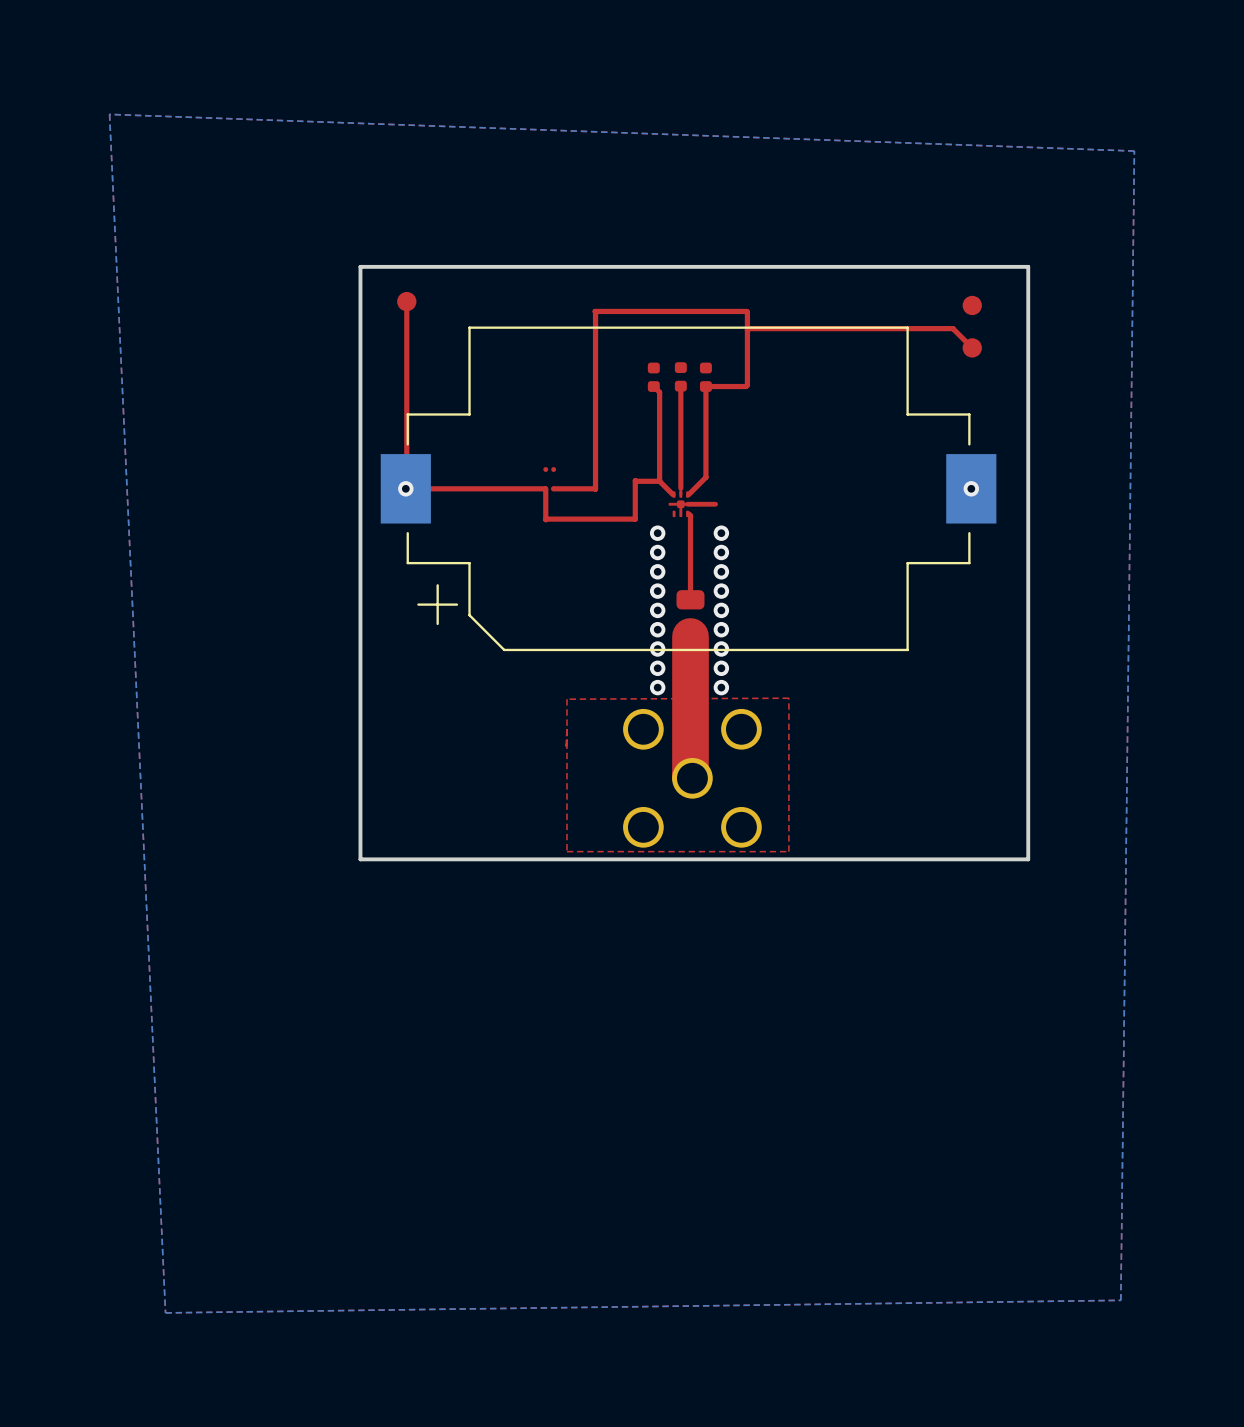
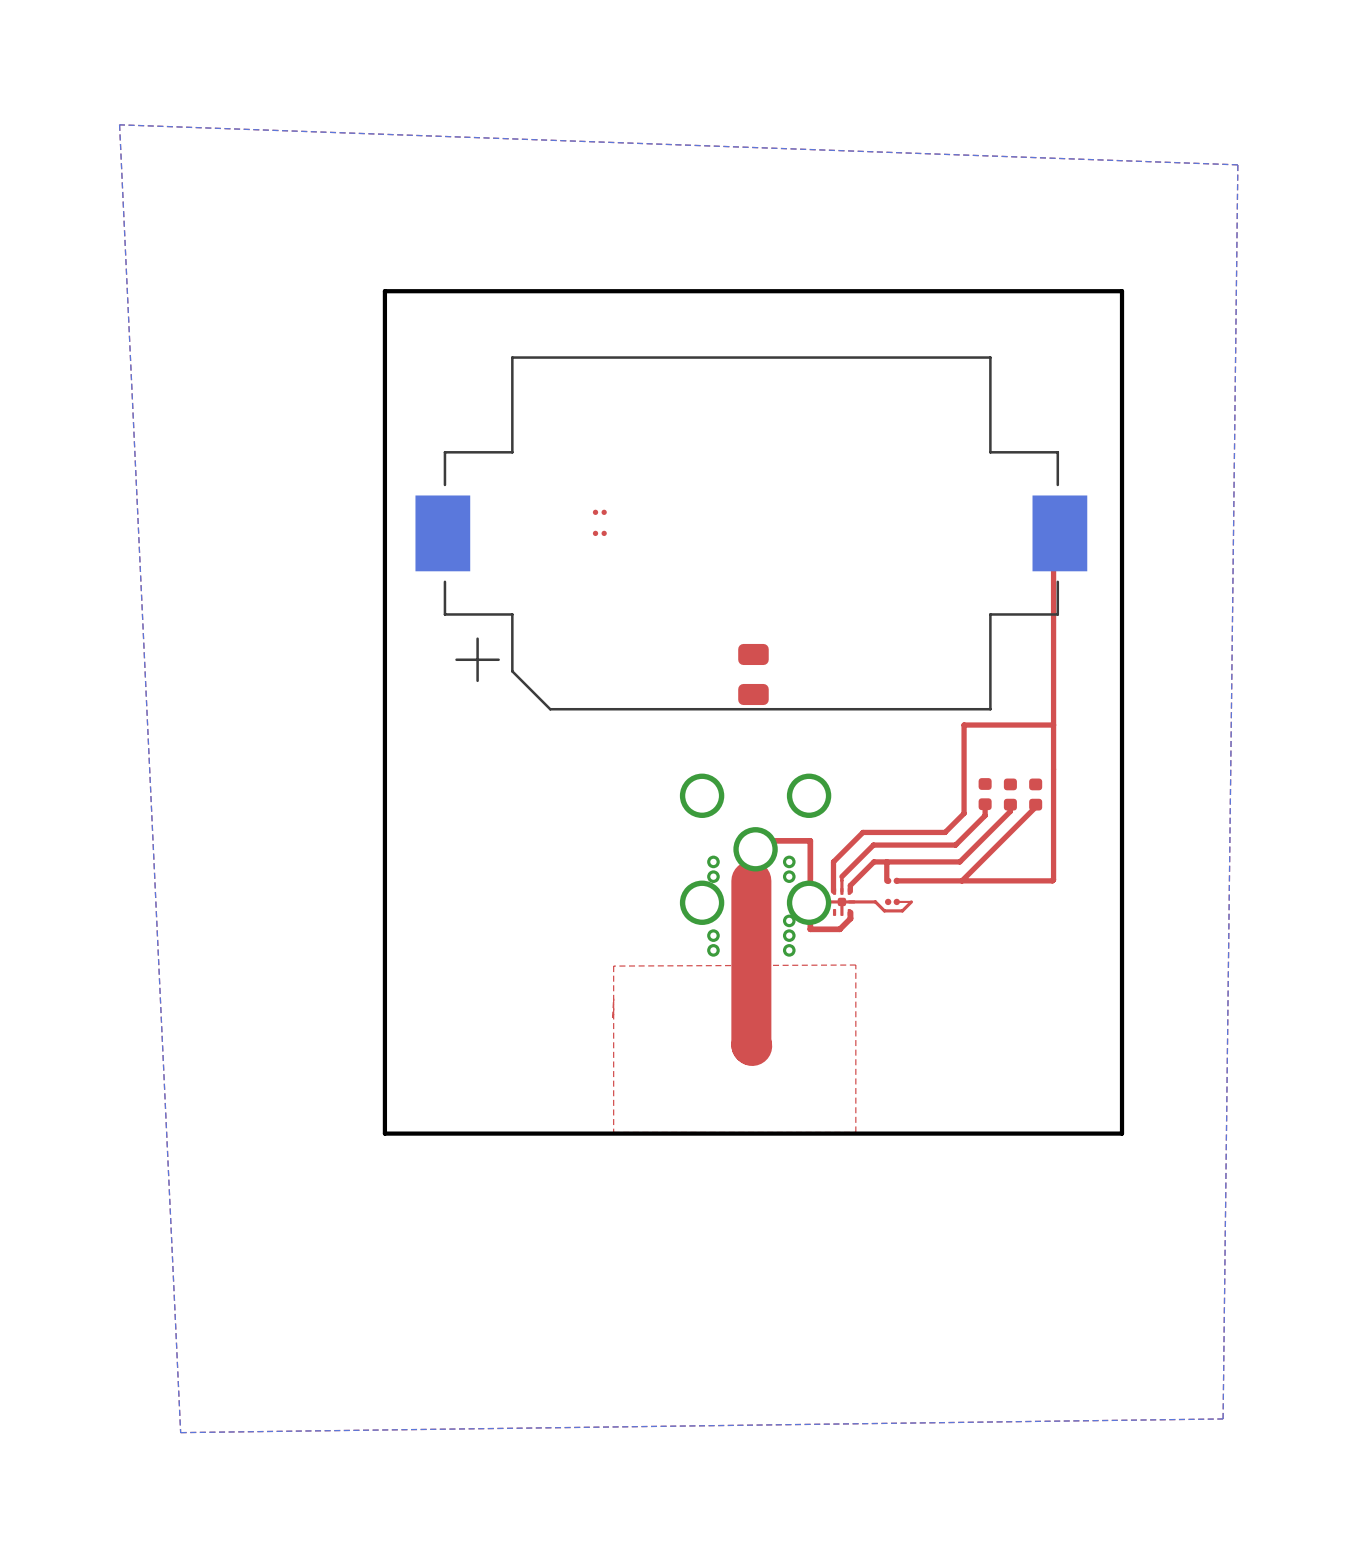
board edge: (360, 266) (360, 859) (1028, 859) -> (393, 291) (384, 291) (384, 1133) (1122, 1133) (1122, 937)
top track: (406, 301) (405, 488) (544, 488) -> none
part: (406, 301) -> none
part: (972, 305) -> none
top track: (747, 330) (749, 328) (952, 328) (972, 347) -> none
part: (972, 347) -> none
part: (680, 376) -> none
part: (653, 377) -> none
part: (705, 377) -> none
top track: (653, 386) (659, 392) (659, 481) -> none
top track: (680, 386) (680, 494) -> none
top track: (659, 481) (635, 480) (635, 518) -> none
top track: (659, 481) (672, 494) -> none
top track: none -> (1053, 528) (1053, 879) (898, 880)
via: (405, 488) -> none
top track: (545, 488) (545, 519) (635, 519) -> none
top track: (553, 488) (595, 489) (595, 311) (746, 311) (747, 384) (705, 386) (705, 477) (688, 494) -> none
via: (971, 488) -> none
part position: (680, 504) -> (841, 901)
top track: (715, 504) (687, 504) -> none
top track: (688, 513) (690, 515) (690, 599) -> none
via: (657, 533) -> none
via: (721, 533) -> none
via: (657, 552) -> none
via: (721, 552) -> none
via: (657, 571) -> none
via: (721, 571) -> none
via: (657, 591) -> none
via: (721, 591) -> none
via: (657, 610) -> none
via: (721, 610) -> none
via: (657, 629) -> none
via: (721, 629) -> none
top track: (690, 636) (690, 776) (692, 778) -> none
via: (657, 649) -> none
via: (721, 649) -> none
top track: none -> (1053, 725) (964, 725) (964, 813) (945, 832) (862, 832) (833, 861) (833, 891)
via: (657, 668) -> none
via: (721, 668) -> none
via: (657, 687) -> none
via: (721, 687) -> none
top zone outline: (788, 698) (788, 851) (566, 851) (566, 699) (788, 698) -> (855, 965) (855, 1132) (613, 1132) (613, 966) (855, 965)
part: none -> (985, 794)
part: none -> (1010, 794)
part: none -> (1035, 794)
top zone outline: (566, 729) (566, 746) (566, 743) -> (613, 998) (612, 1017) (613, 1014)
top track: none -> (985, 804) (985, 815) (955, 845) (873, 845) (841, 876) (841, 891)
top track: none -> (1010, 804) (1010, 811) (959, 861) (873, 861) (850, 885) (850, 891)
top track: none -> (1035, 804) (1035, 807) (961, 880)
top track: none -> (751, 840) (810, 840) (810, 929) (839, 929) (850, 918) (850, 912)
via: none -> (713, 861)
via: none -> (789, 861)
top track: none -> (886, 861) (886, 880)
via: none -> (713, 876)
via: none -> (789, 876)
top track: none -> (751, 880) (752, 1045)
part: none -> (892, 891)
top track: none -> (896, 901) (911, 901) (902, 910) (884, 910) (875, 901) (849, 901)
via: none -> (789, 920)
via: none -> (713, 935)
via: none -> (789, 935)
via: none -> (713, 950)
via: none -> (789, 950)

